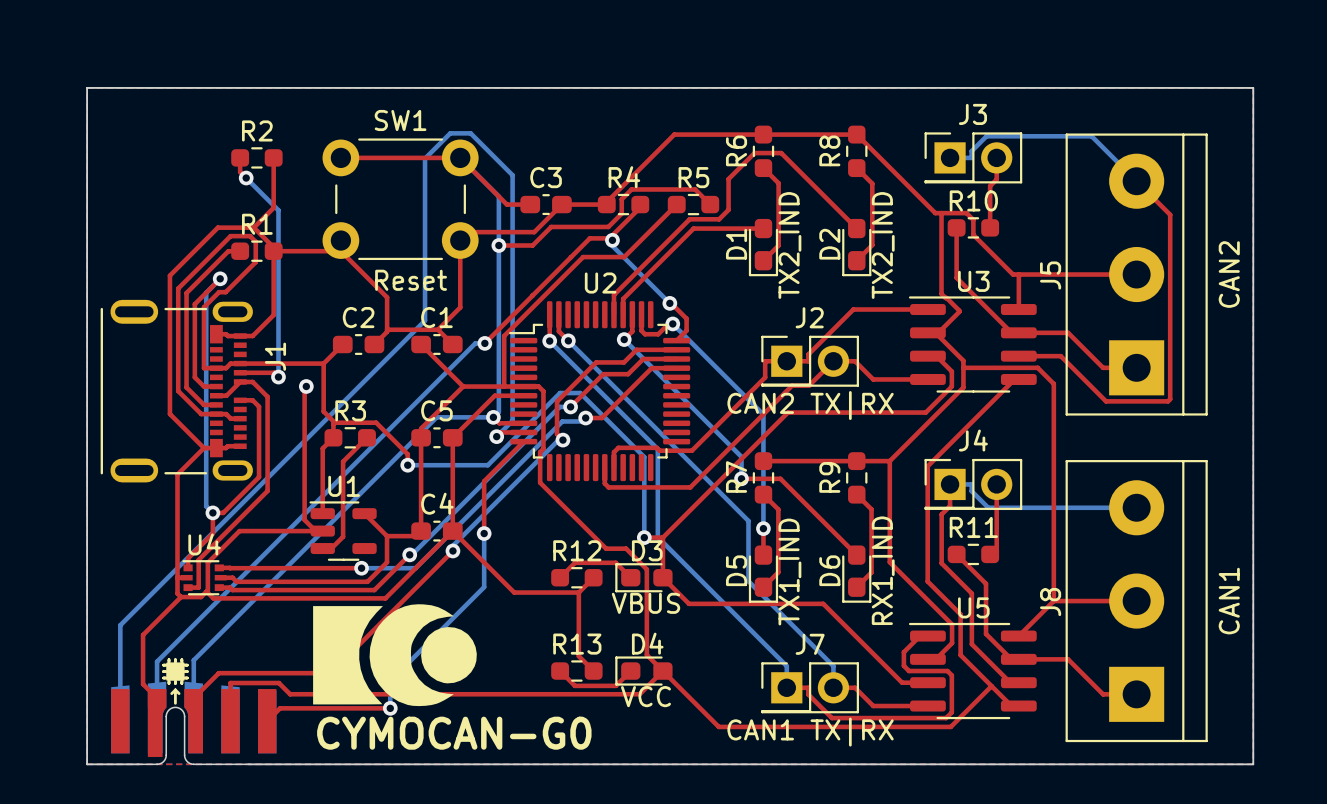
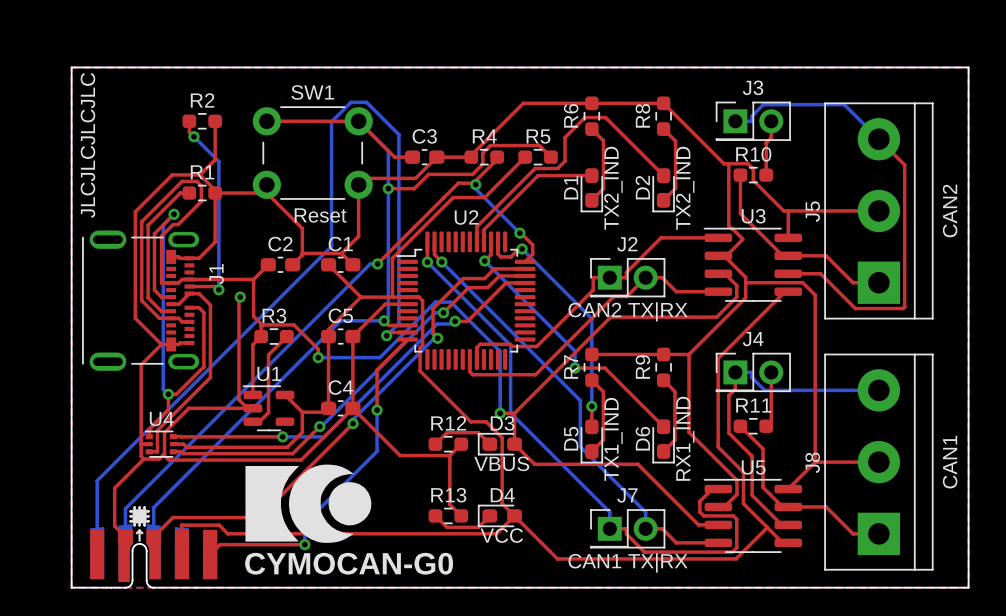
text: none -> JLCJLCJLCJLC (87, 145)

